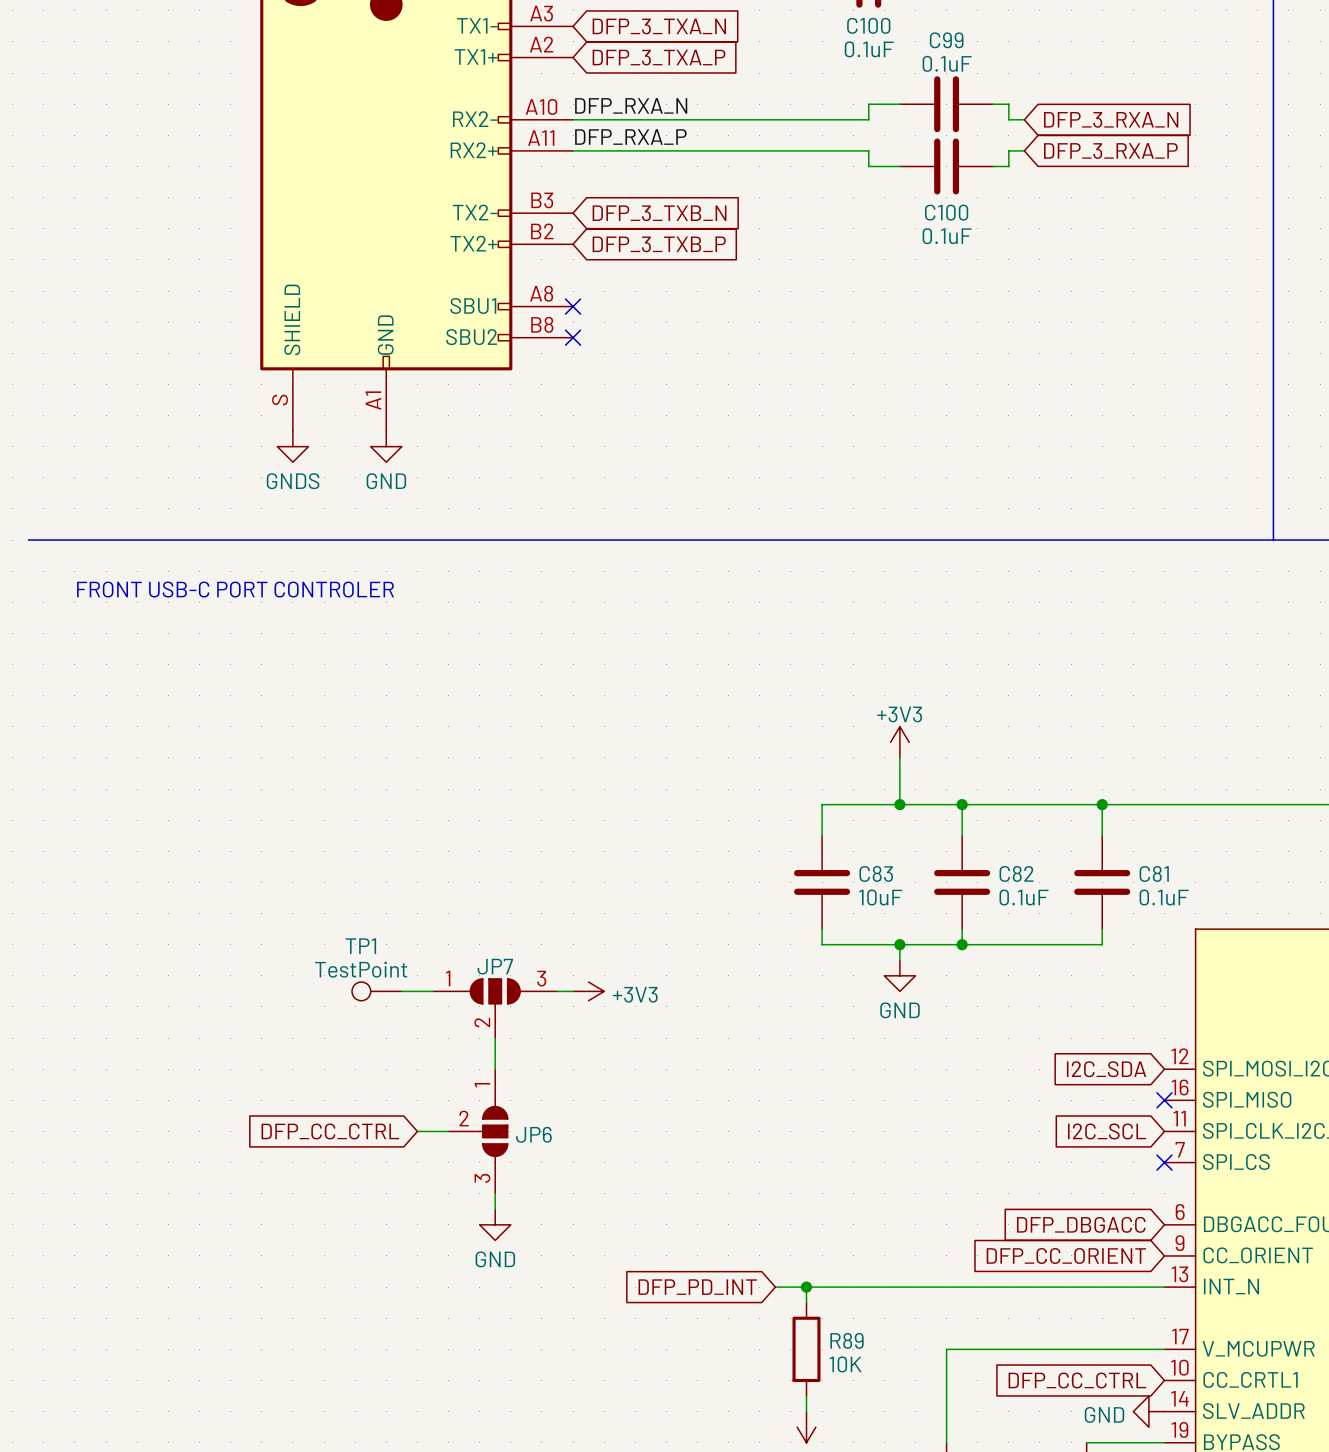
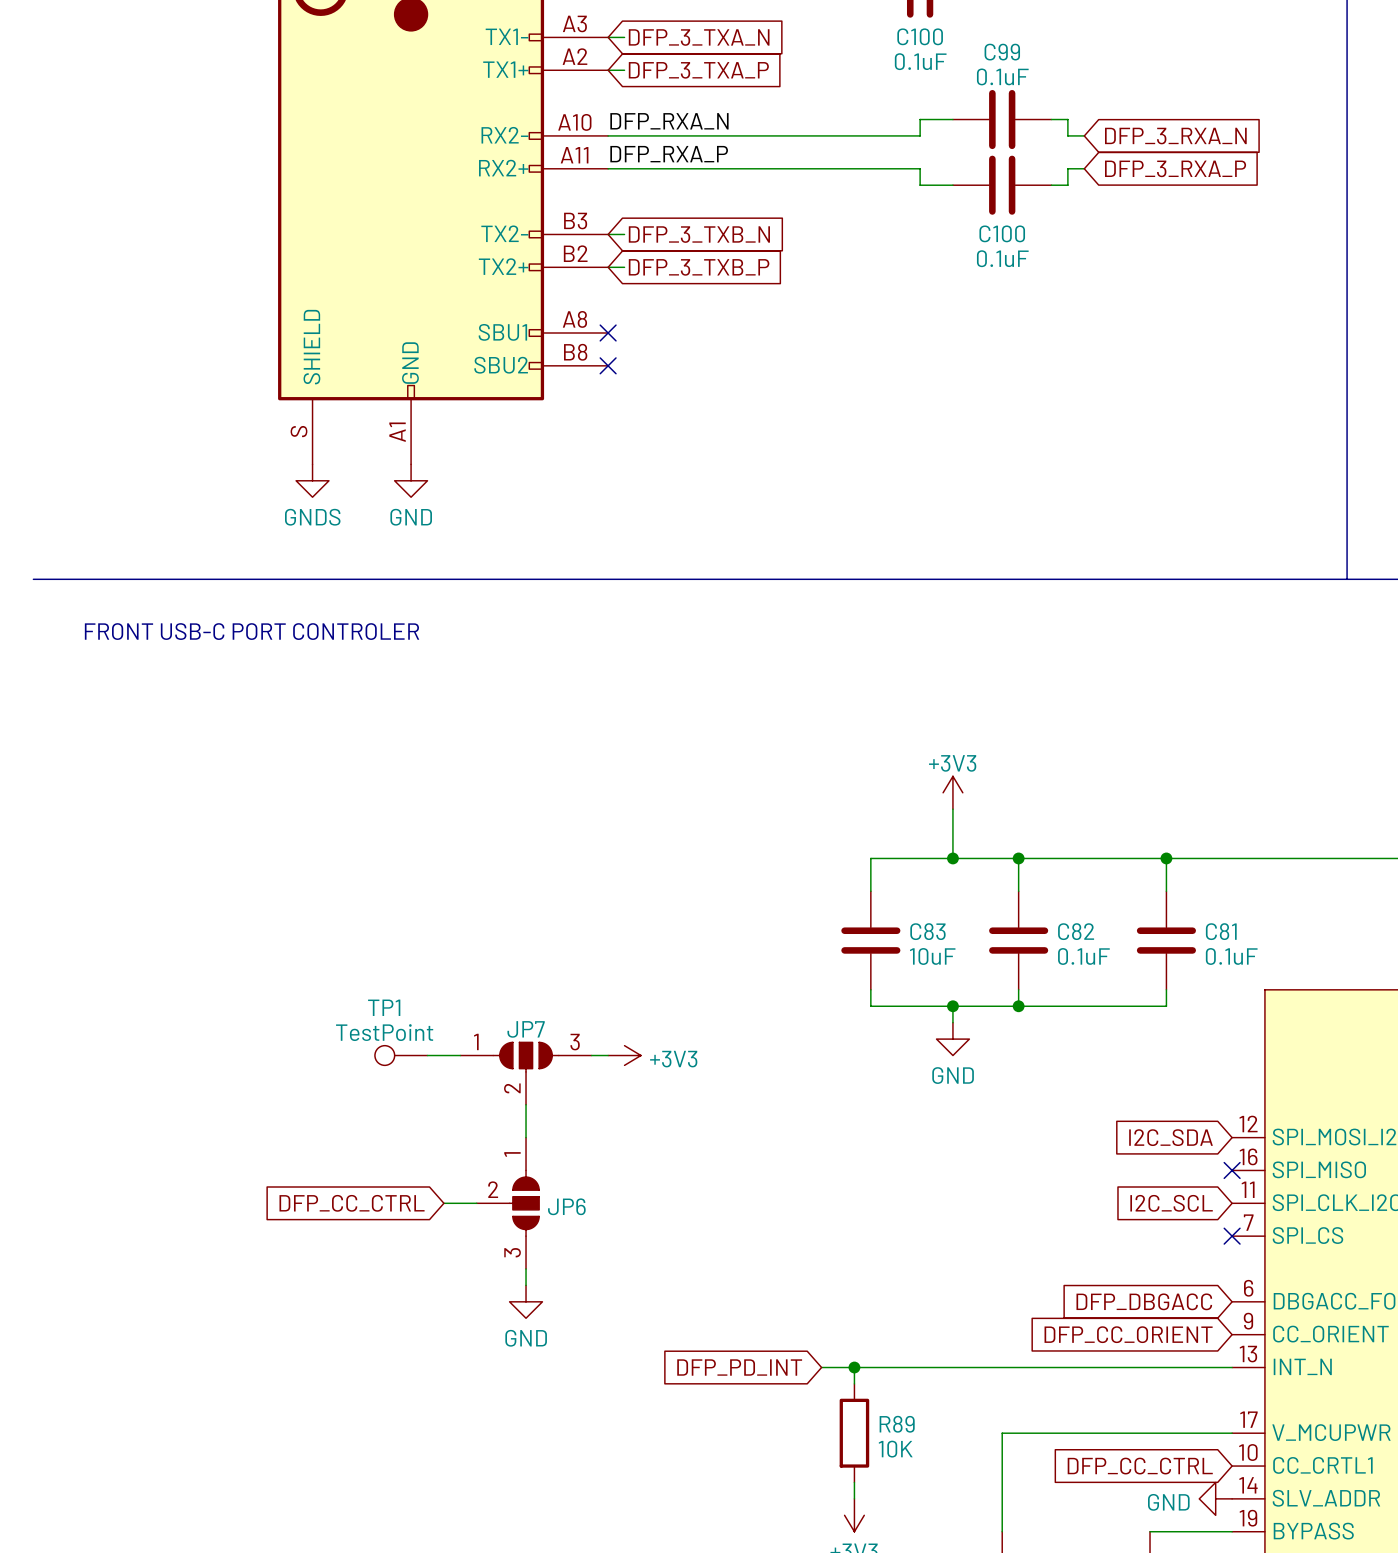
wire: none -> (608, 37) (624, 37)
wire: none -> (608, 70) (624, 70)
wire: none -> (608, 234) (624, 234)
wire: none -> (608, 267) (624, 267)

